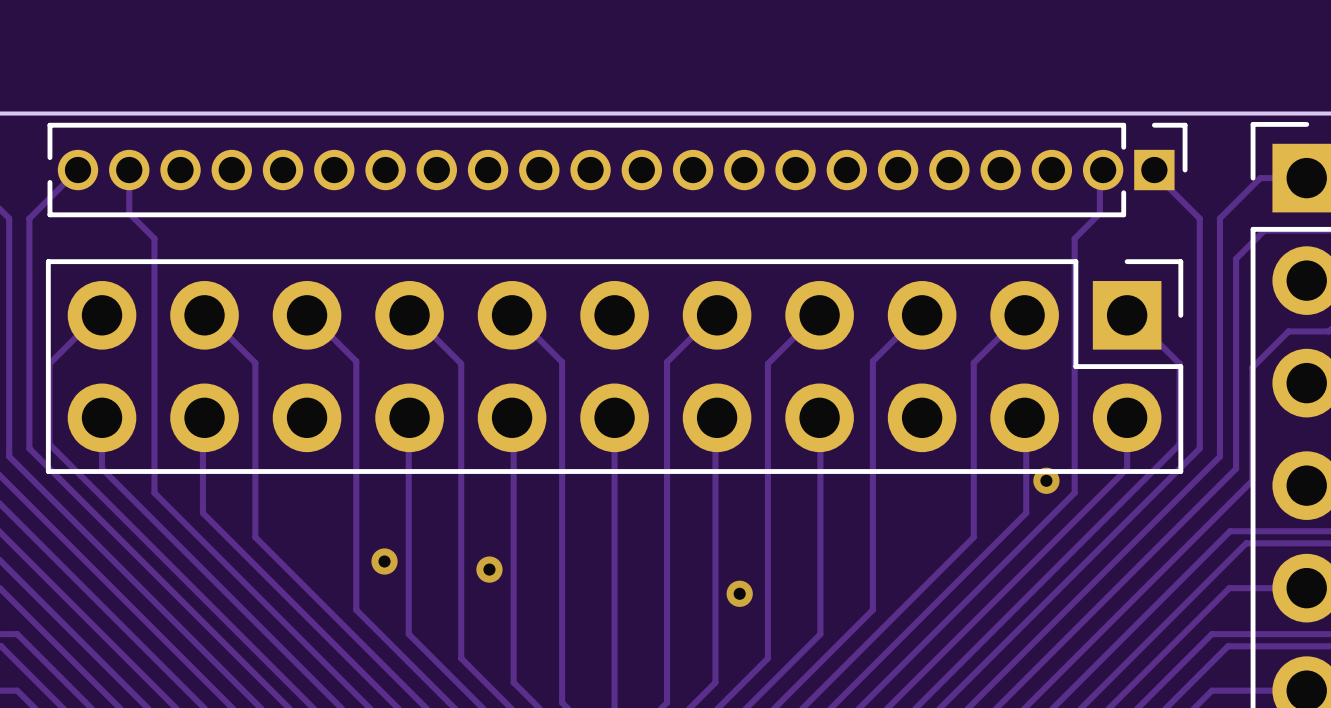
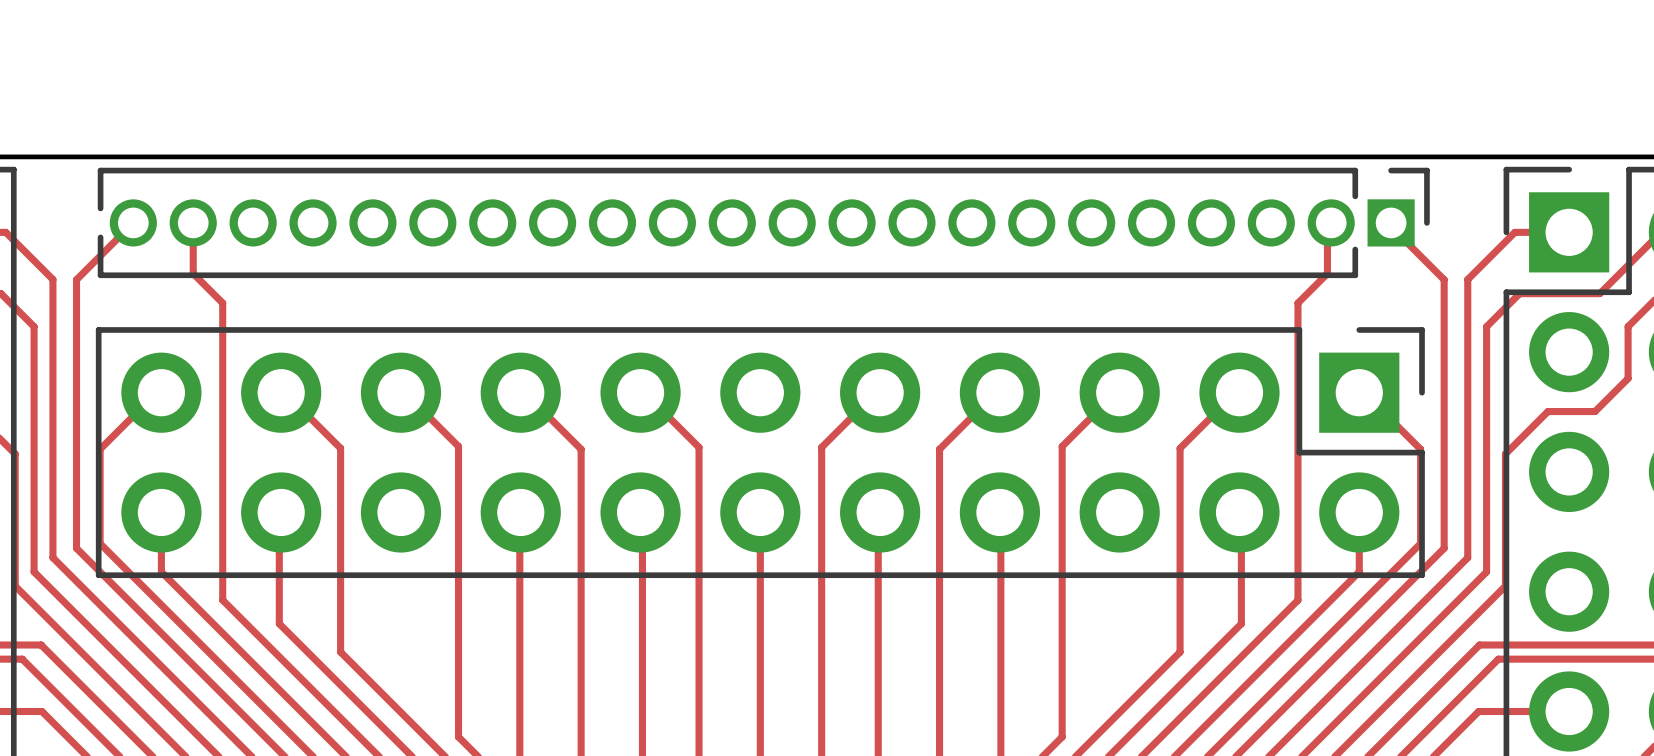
via: (1046, 480) -> none
via: (384, 561) -> none
via: (489, 569) -> none
via: (739, 593) -> none

